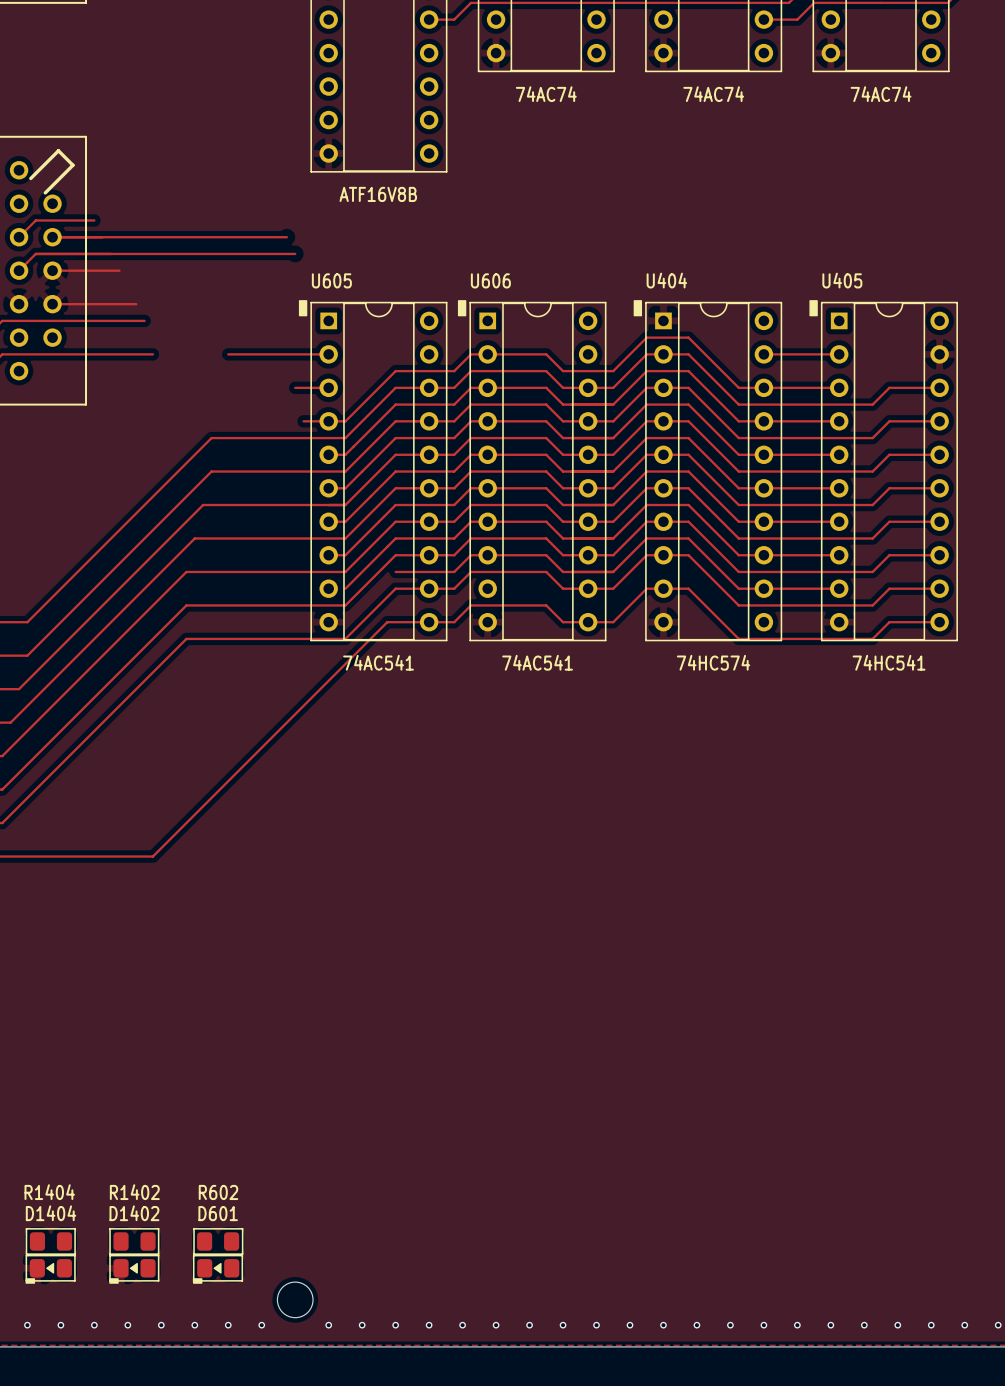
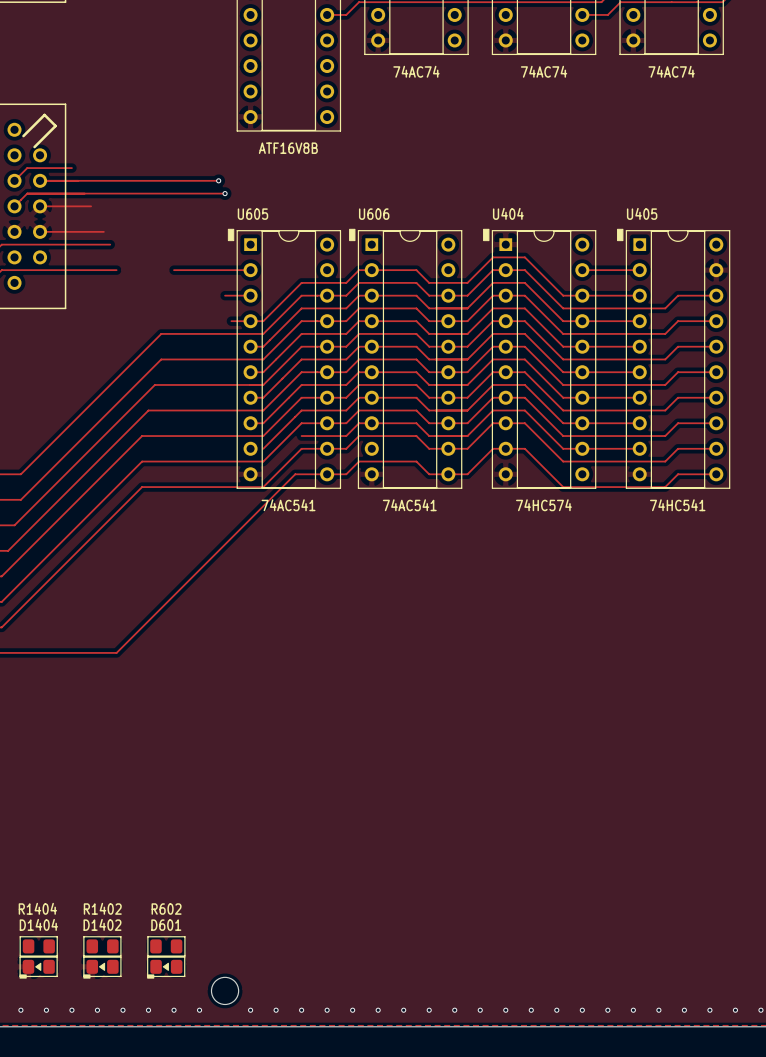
via: none -> (218, 180)
via: none -> (225, 193)

